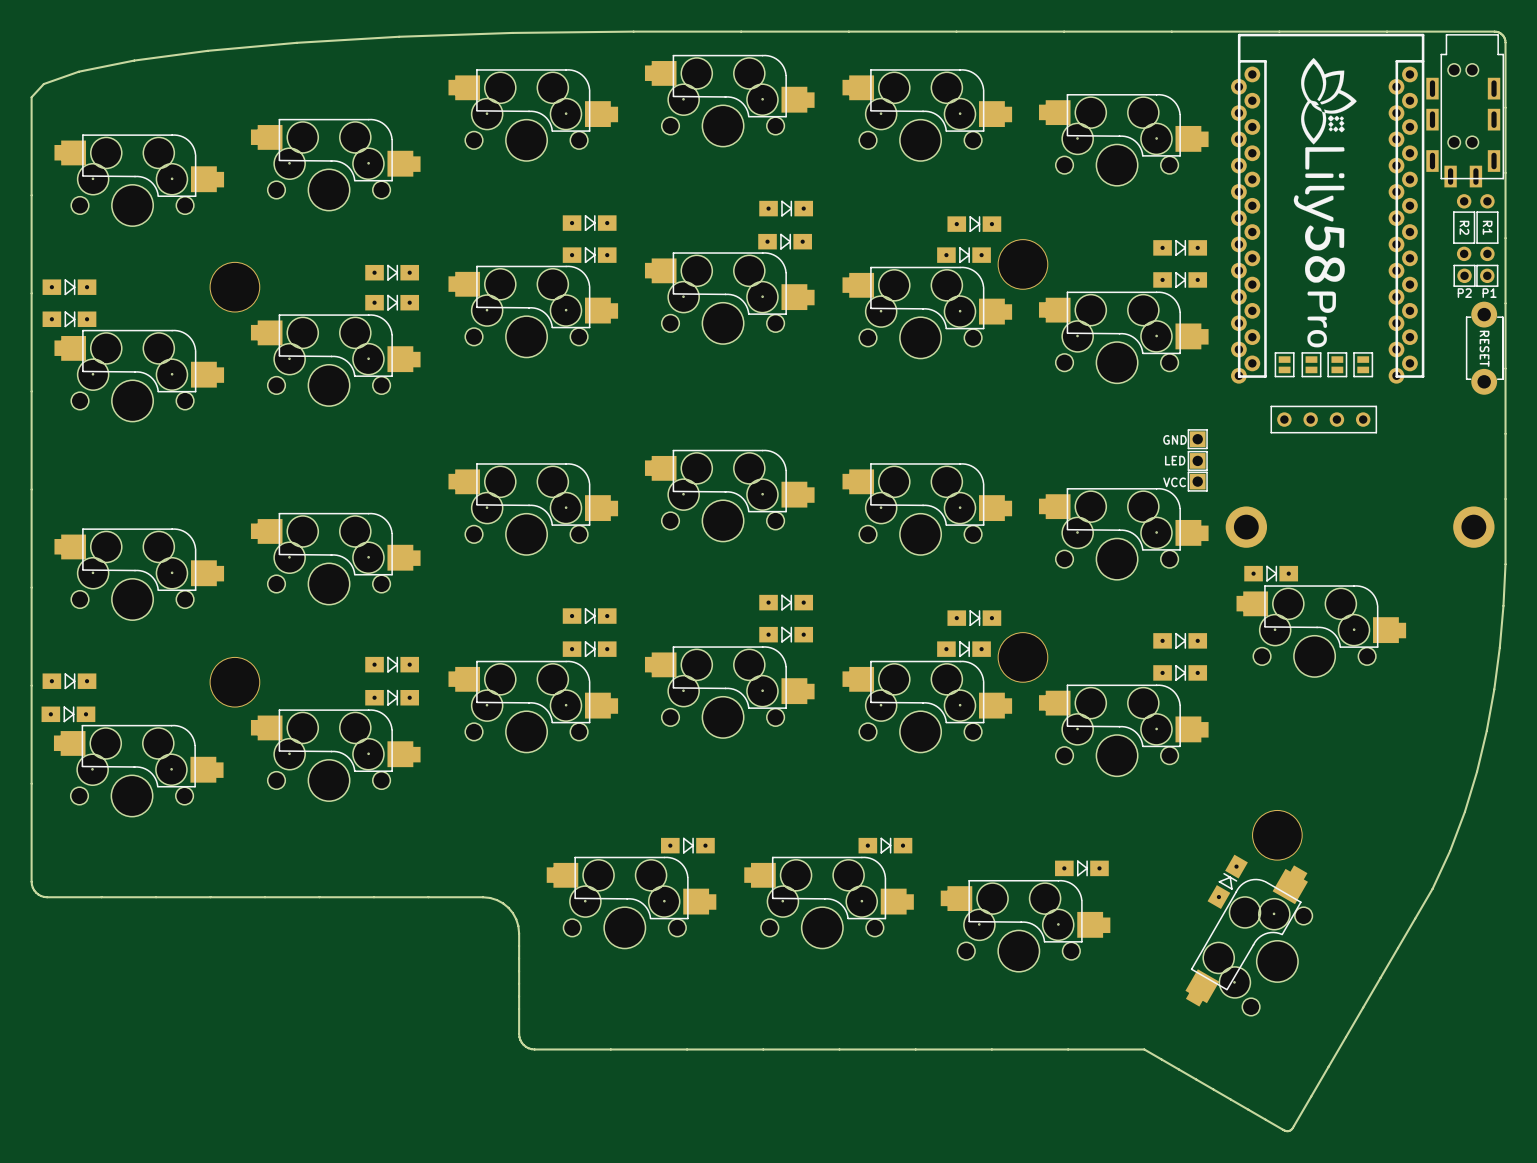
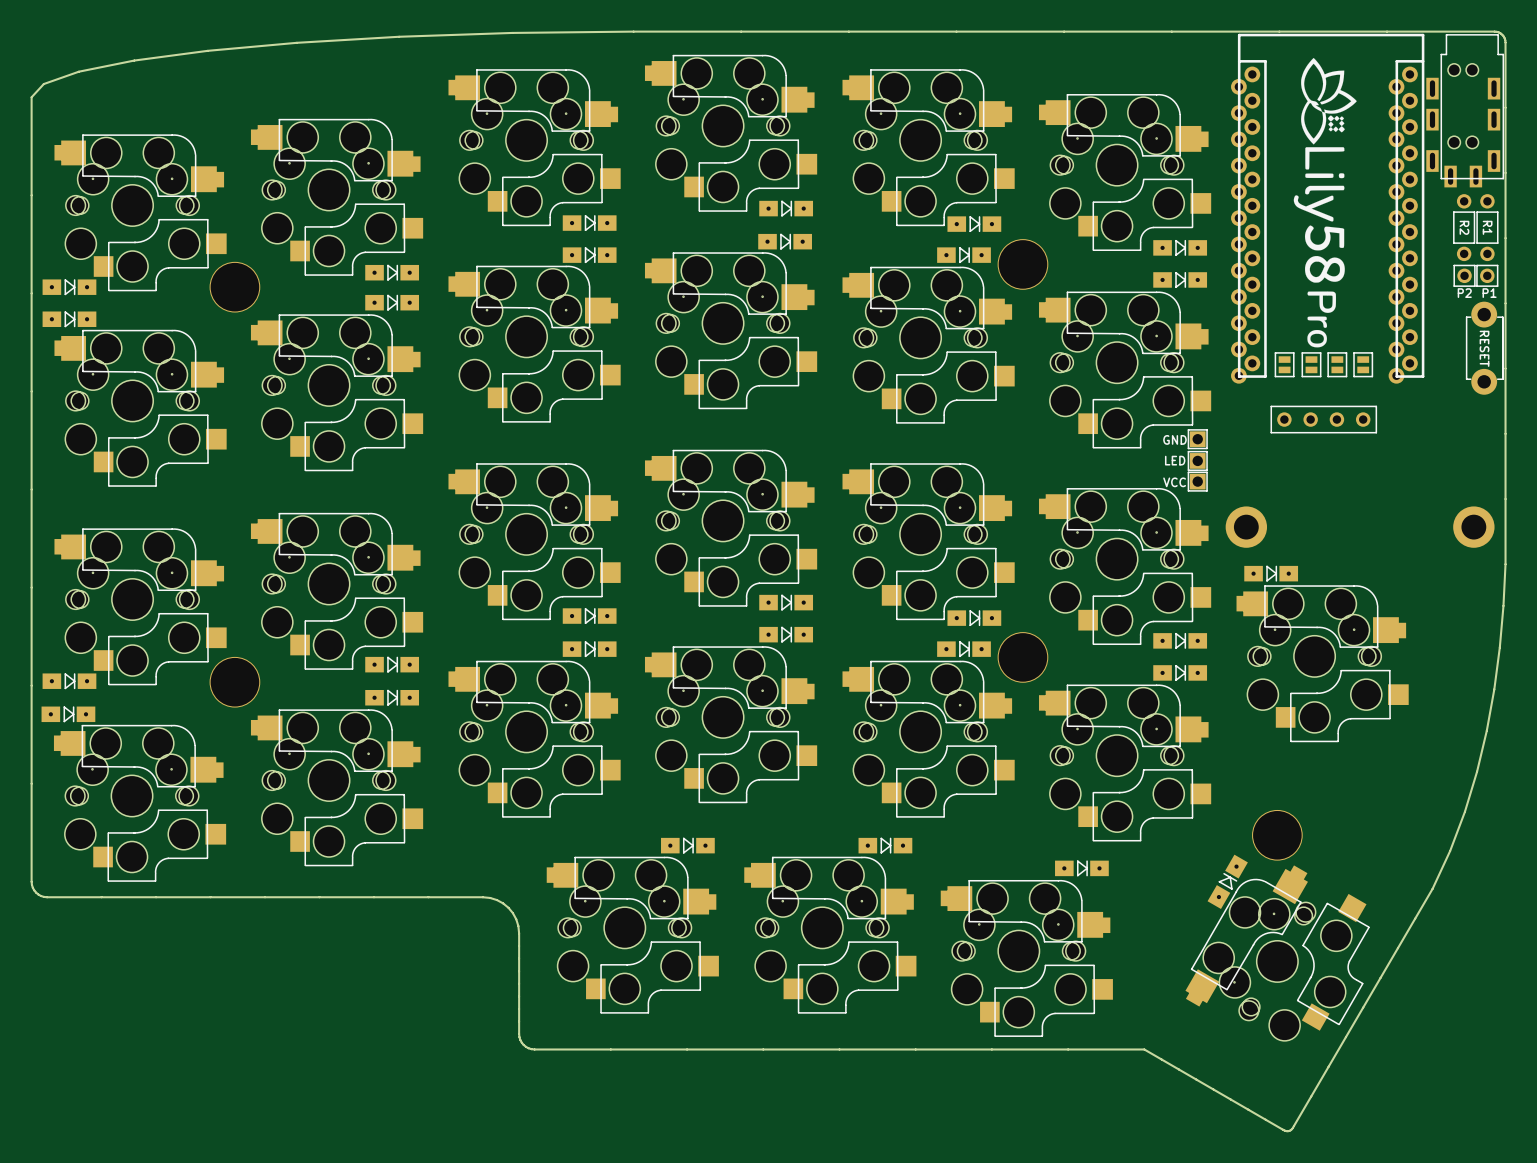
part: (729, 100) -> none
part: (533, 115) -> none
part: (927, 115) -> none
part: none -> (731, 133)
part: (1123, 139) -> none
part: none -> (534, 147)
part: none -> (928, 147)
part: (335, 164) -> none
part: none -> (1125, 172)
part: (139, 180) -> none
part: none -> (337, 197)
part: none -> (140, 212)
part: (729, 298) -> none
part: (533, 311) -> none
part: (927, 312) -> none
part: none -> (731, 330)
part: (1123, 337) -> none
part: none -> (534, 344)
part: none -> (928, 345)
part: (335, 360) -> none
part: none -> (1125, 369)
part: (139, 375) -> none
part: none -> (337, 392)
part: none -> (140, 408)
part: (729, 495) -> none
part: (533, 509) -> none
part: (927, 509) -> none
part: none -> (731, 528)
part: (1123, 533) -> none
part: none -> (534, 541)
part: none -> (928, 541)
part: (335, 558) -> none
part: none -> (1125, 566)
part: (139, 574) -> none
part: none -> (337, 591)
part: none -> (140, 606)
part: (1321, 631) -> none
part: none -> (1322, 663)
part: (729, 692) -> none
part: (533, 706) -> none
part: (927, 706) -> none
part: none -> (731, 724)
part: (1123, 730) -> none
part: none -> (534, 739)
part: none -> (928, 739)
part: (335, 755) -> none
part: none -> (1125, 762)
part: (138, 770) -> none
part: none -> (337, 787)
part: none -> (140, 803)
part: (631, 902) -> none
part: (829, 902) -> none
part: (1025, 925) -> none
part: none -> (632, 935)
part: none -> (830, 935)
part: (1248, 940) -> none
part: none -> (1277, 953)
part: none -> (1026, 958)

